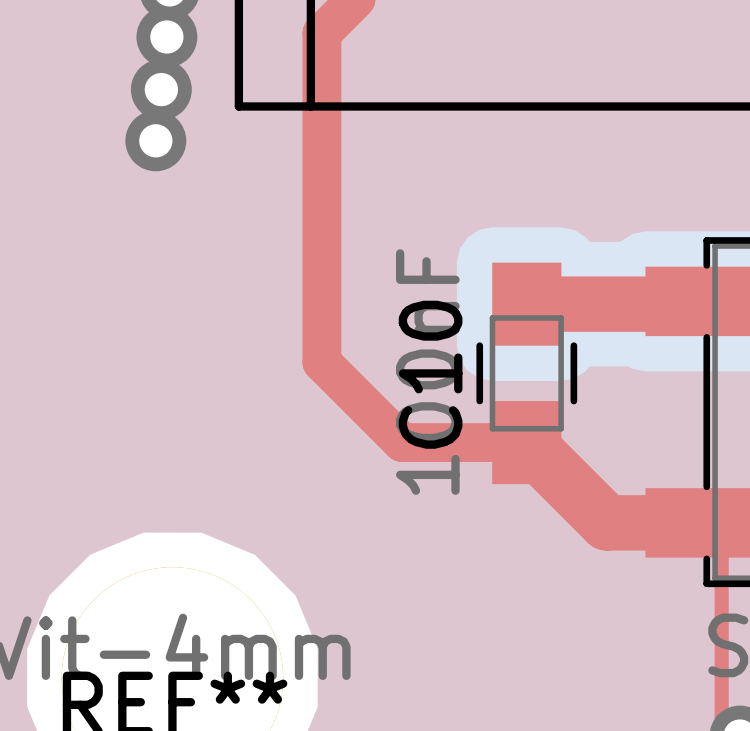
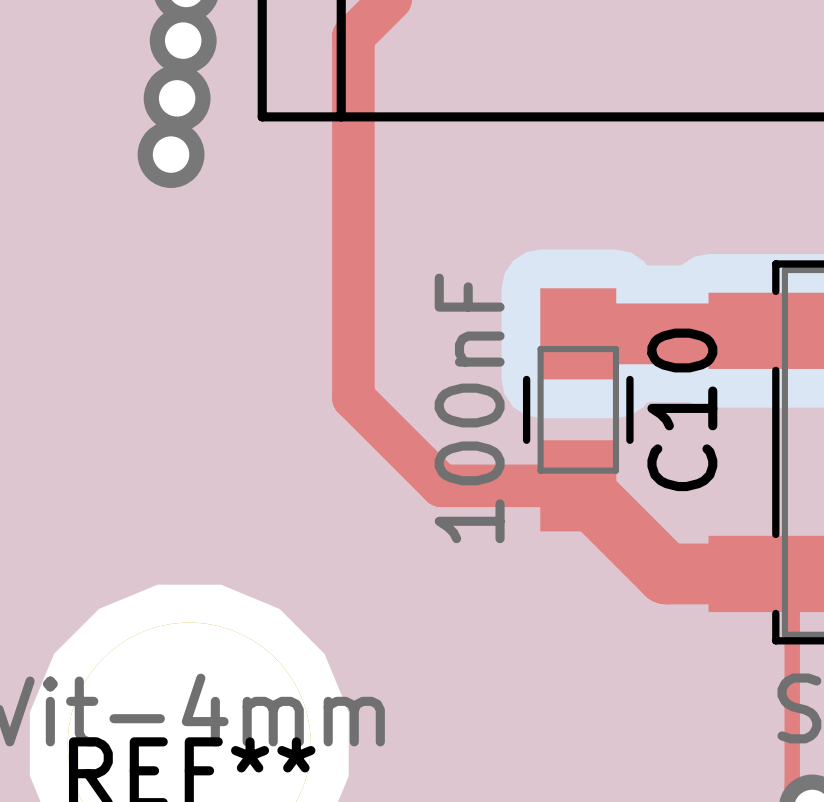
C10 name position: C10 (430, 374) -> C10 (682, 409)

